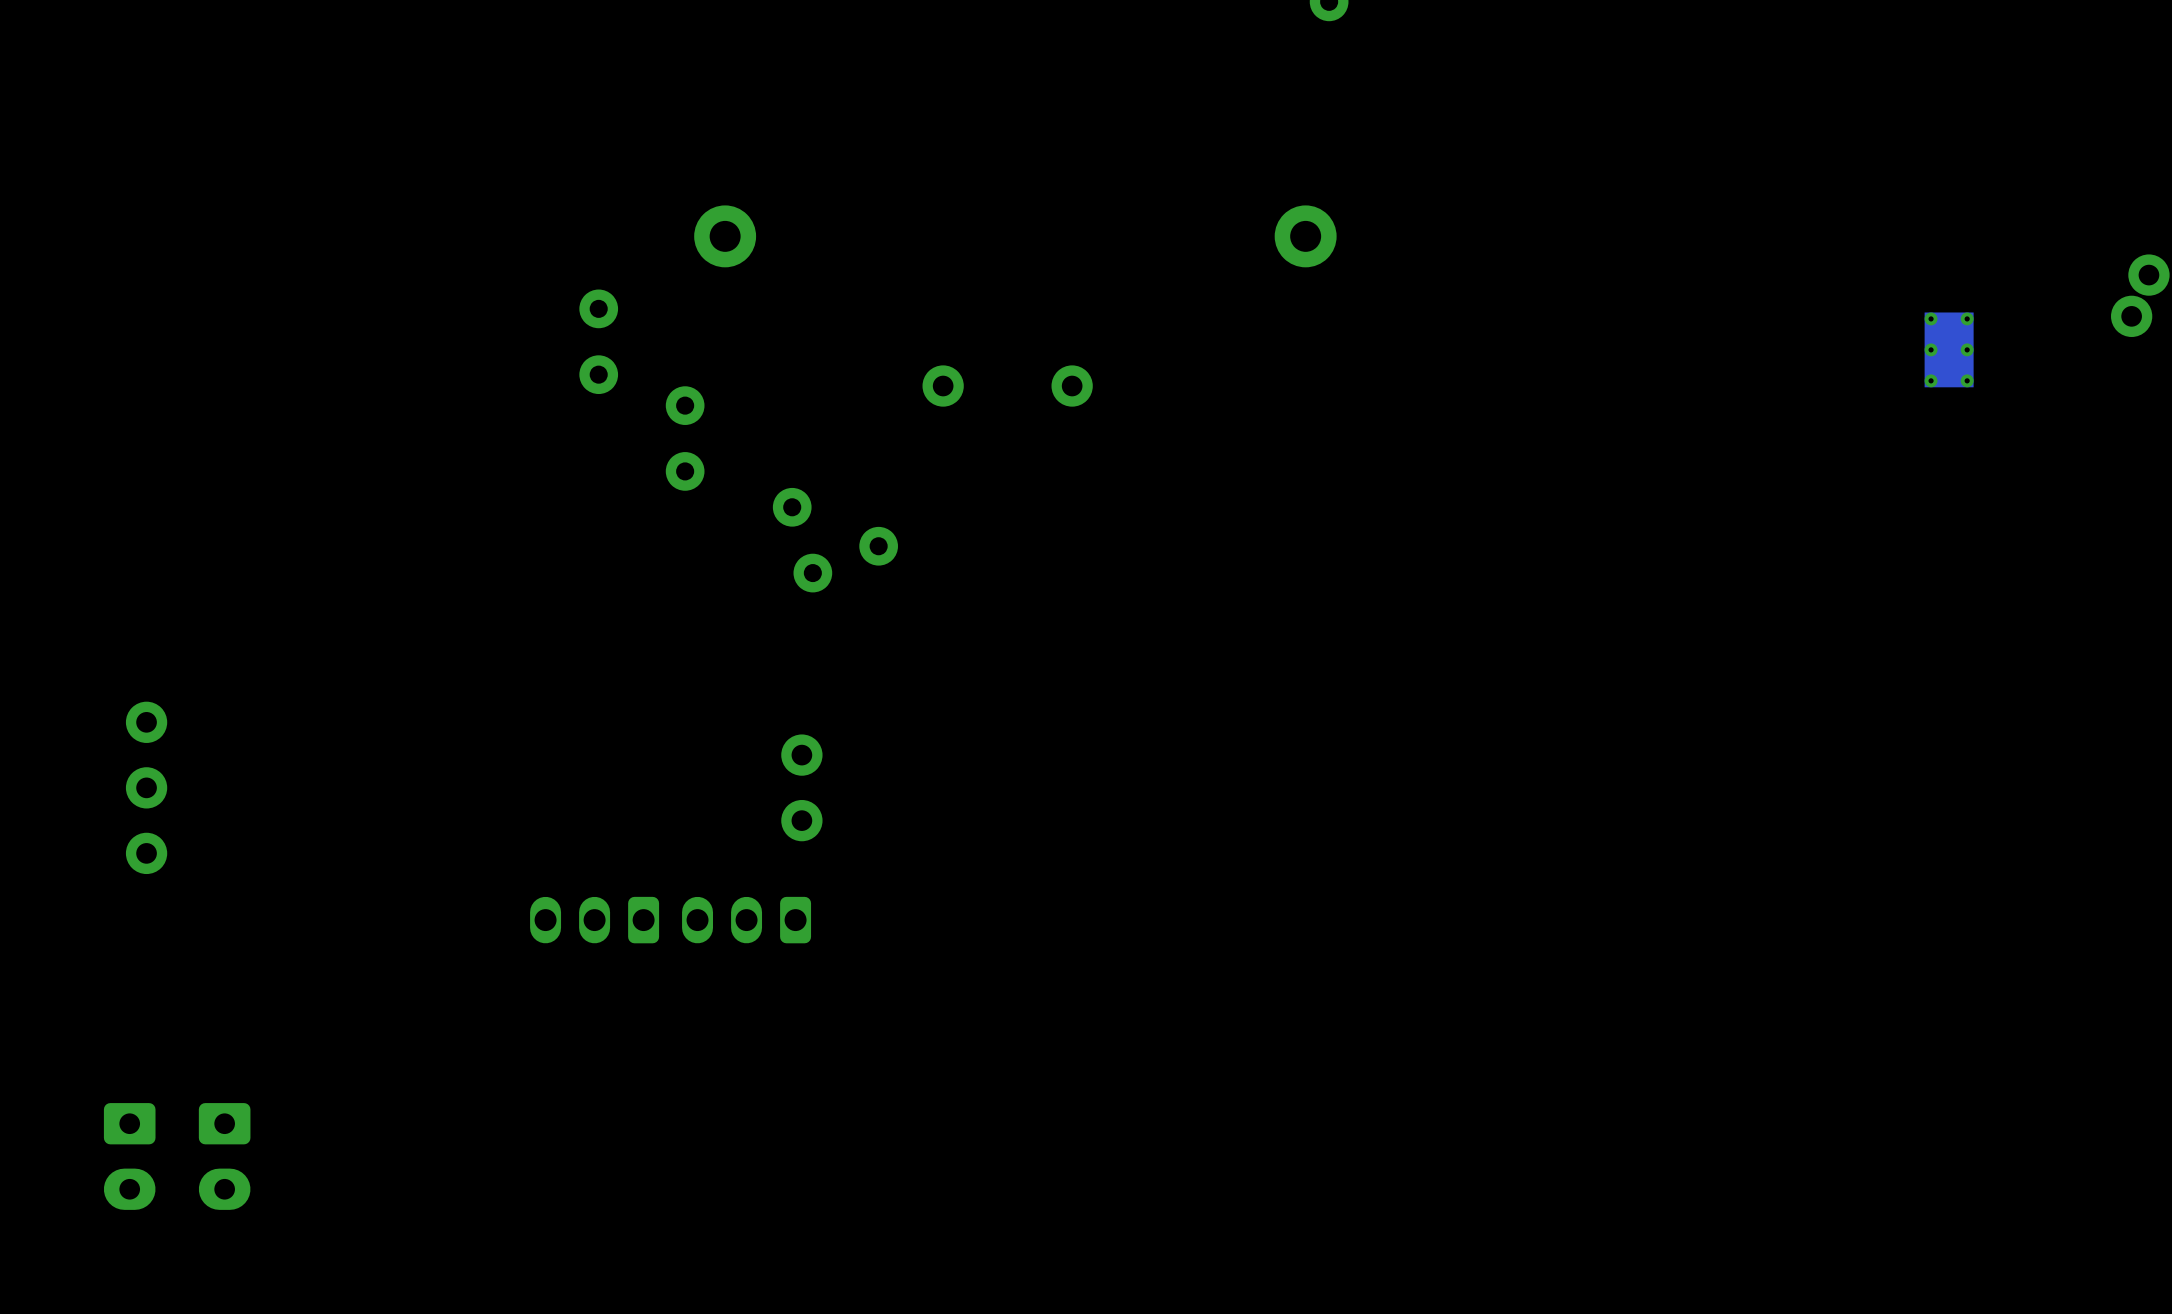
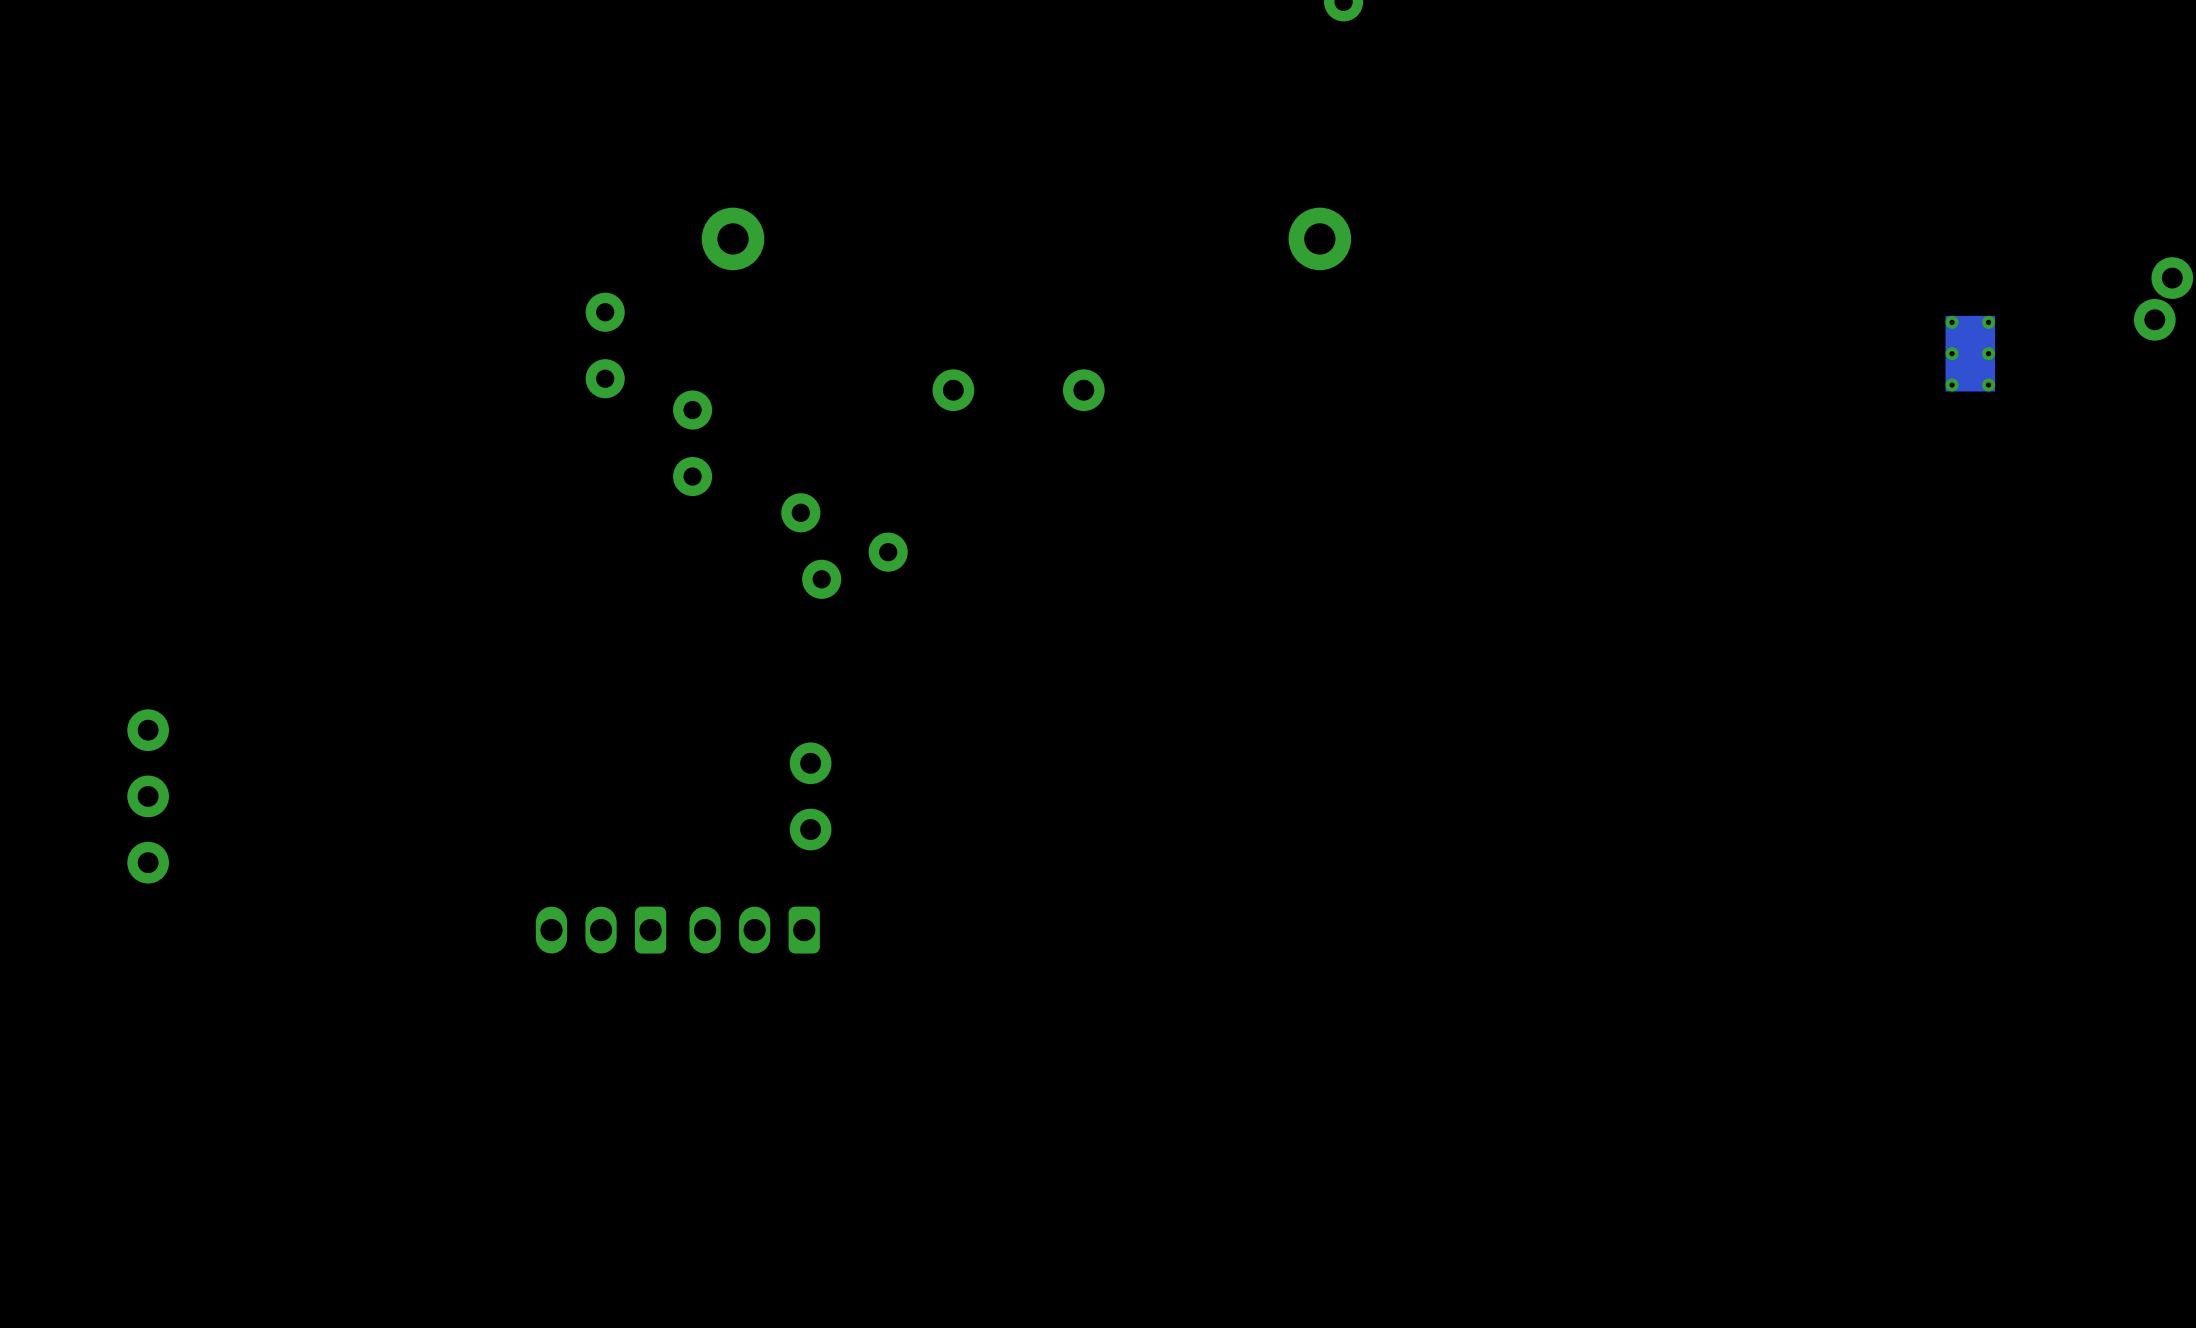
part: (129, 1156) -> none
part: (224, 1156) -> none

